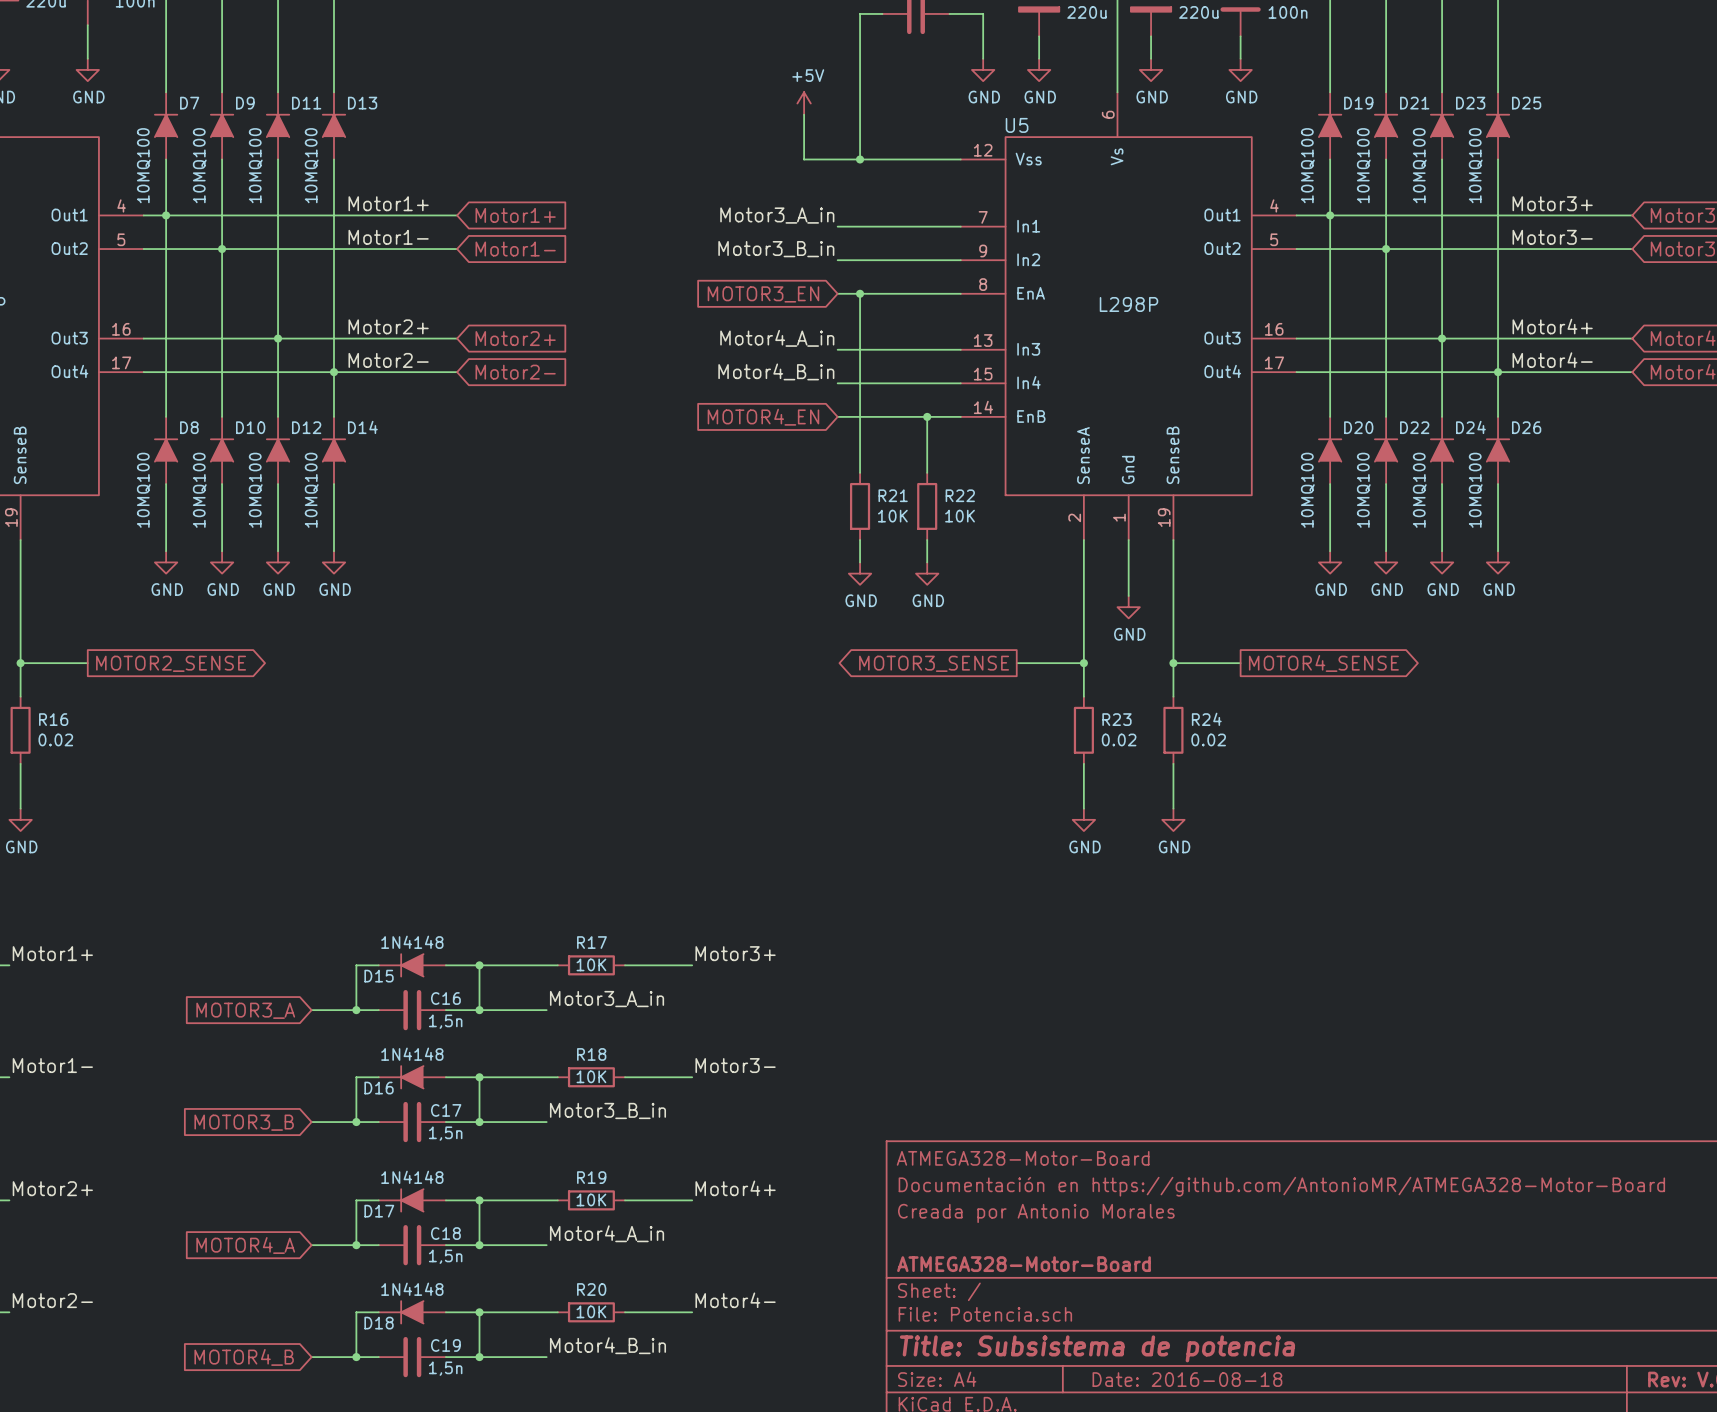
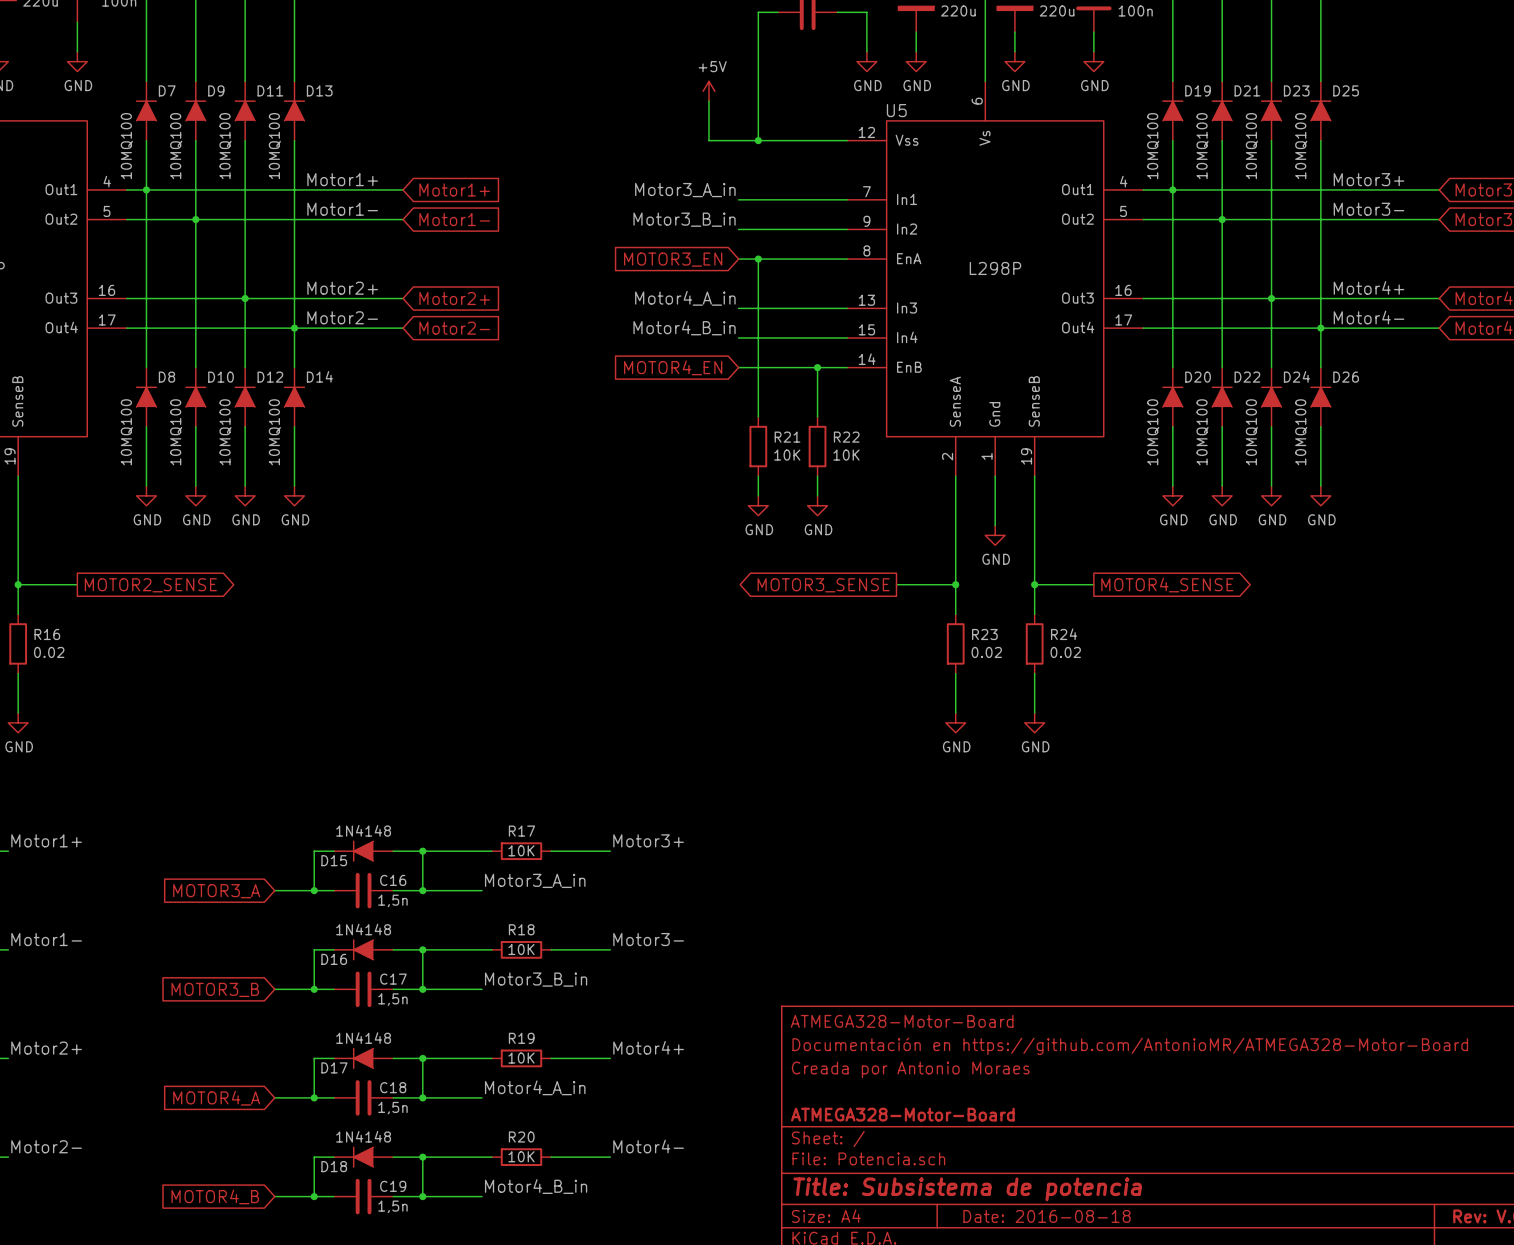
title block: Creada por Antonio Morales (1036, 1213) -> Creada por Antonio Moraes (910, 1069)

